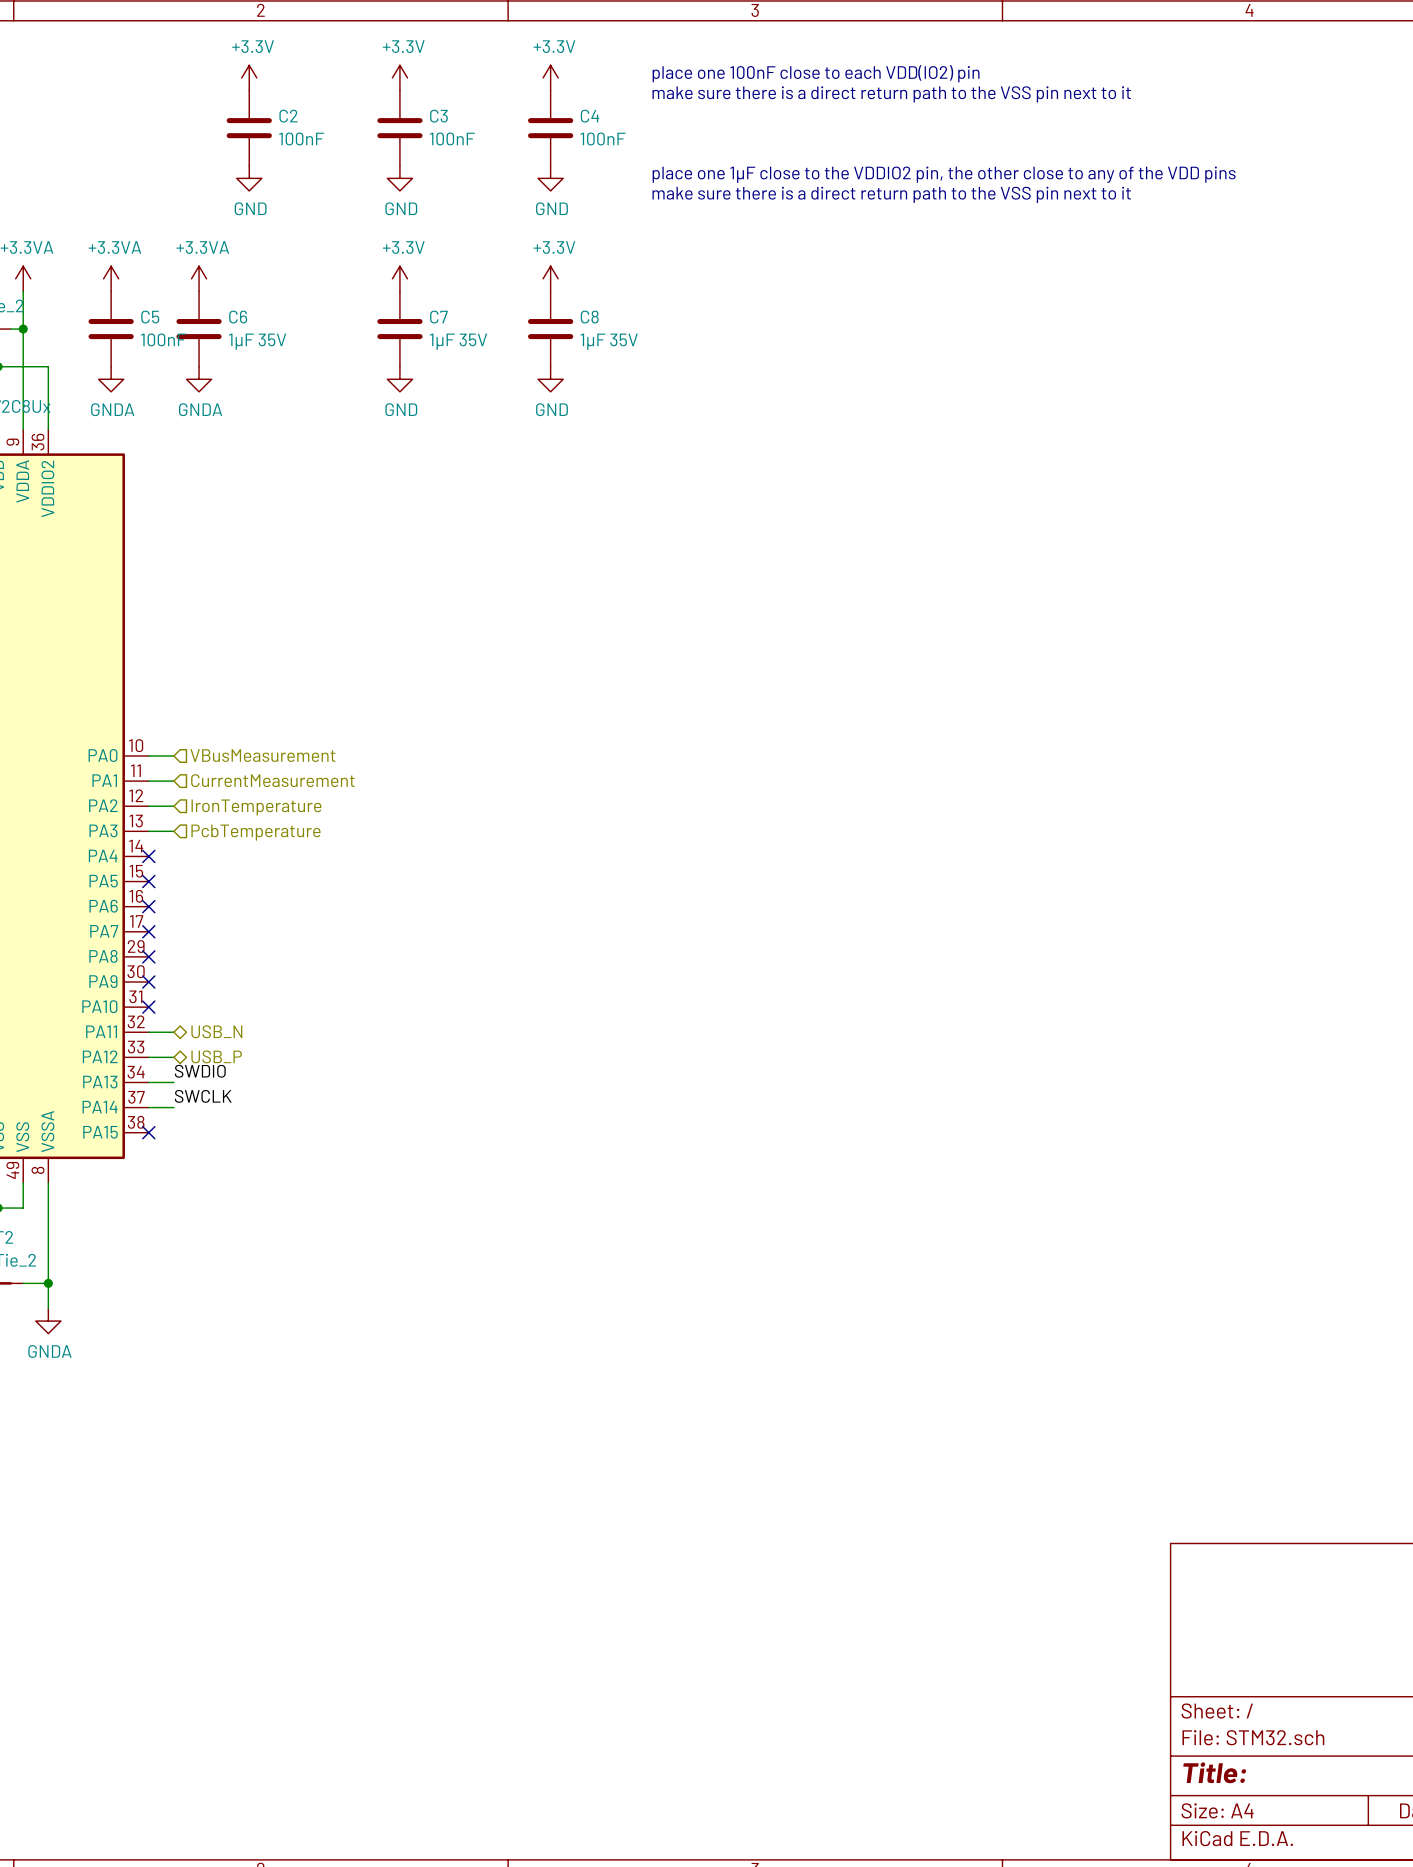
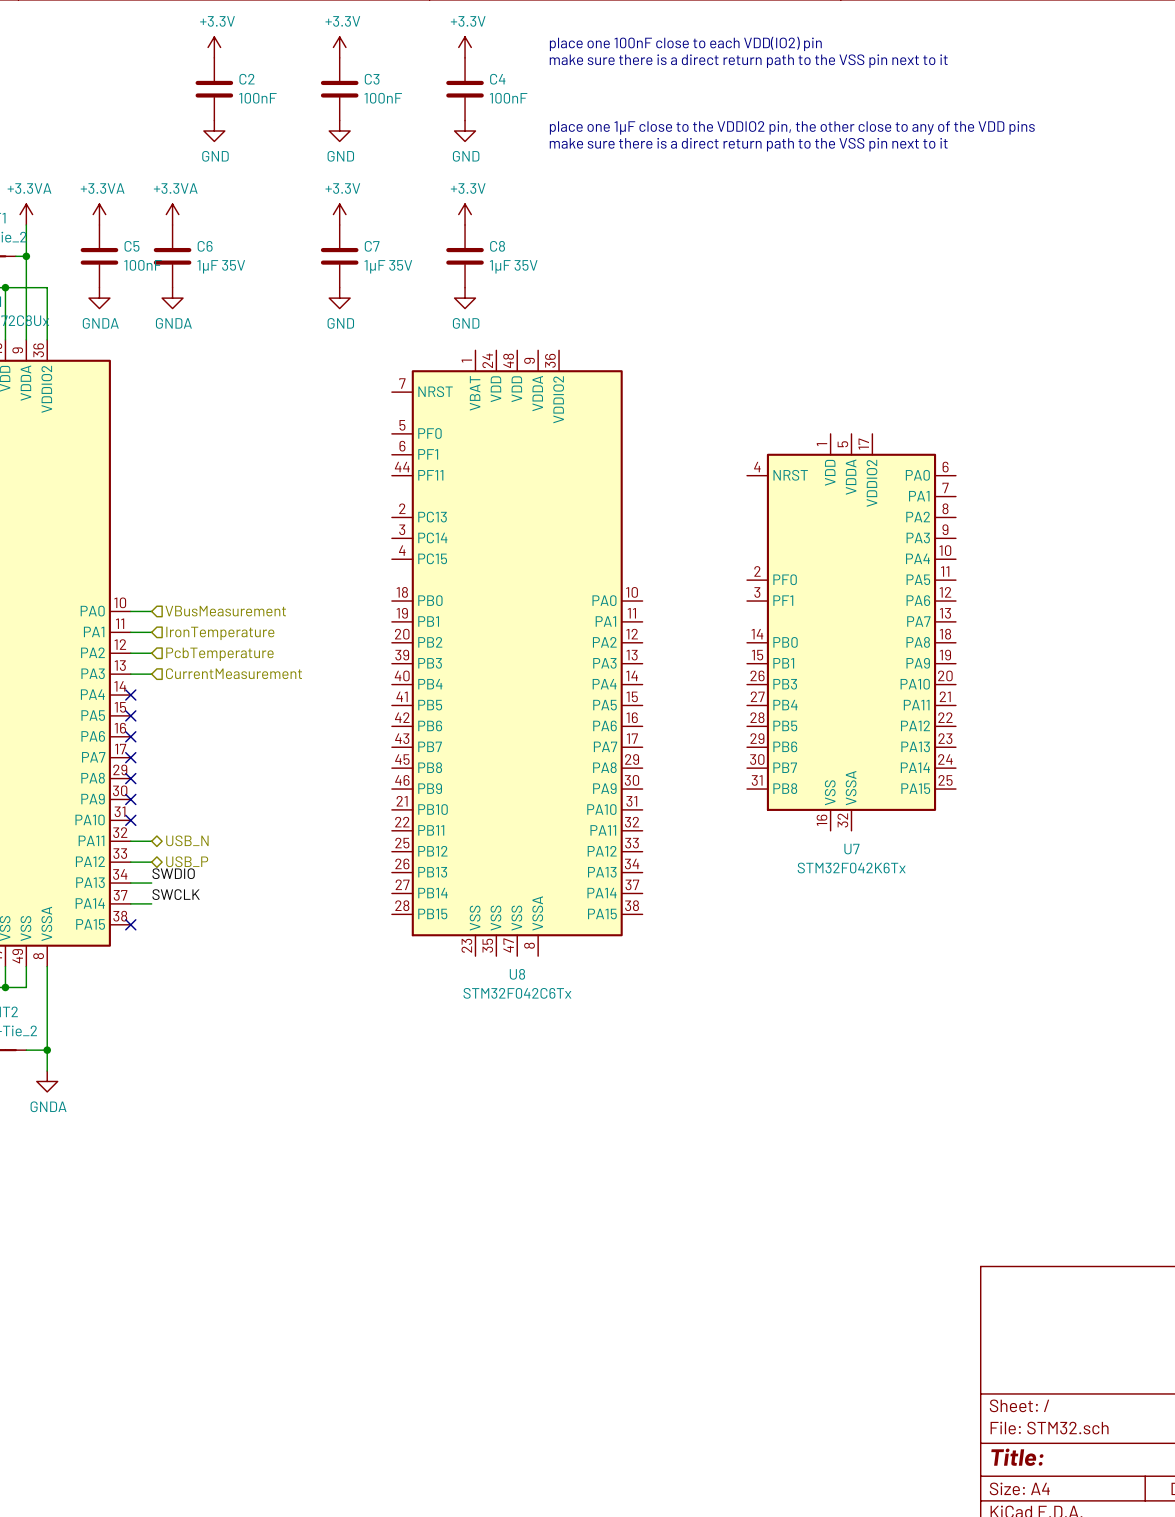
hierarchical label: CurrentMeasurement (272, 780) -> IronTemperature (220, 633)
U7: none -> STM32F042K6Tx (851, 632)
U8: none -> STM32F042C6Tx (517, 653)
hierarchical label: IronTemperature (256, 807) -> PcbTemperature (219, 654)
hierarchical label: PcbTemperature (255, 832) -> CurrentMeasurement (234, 673)

